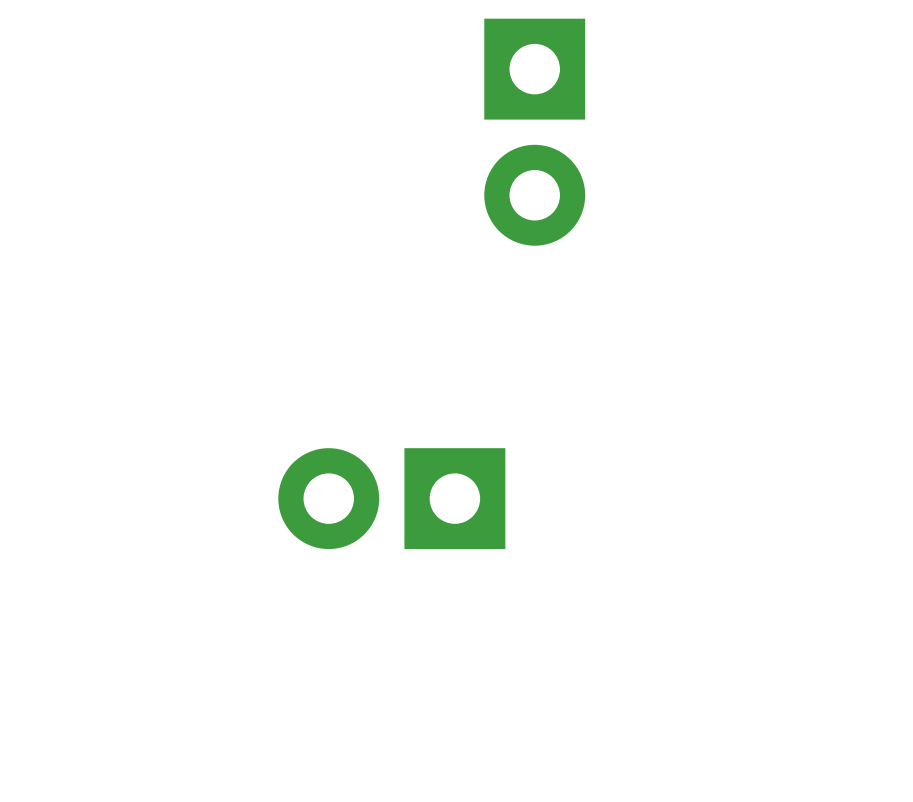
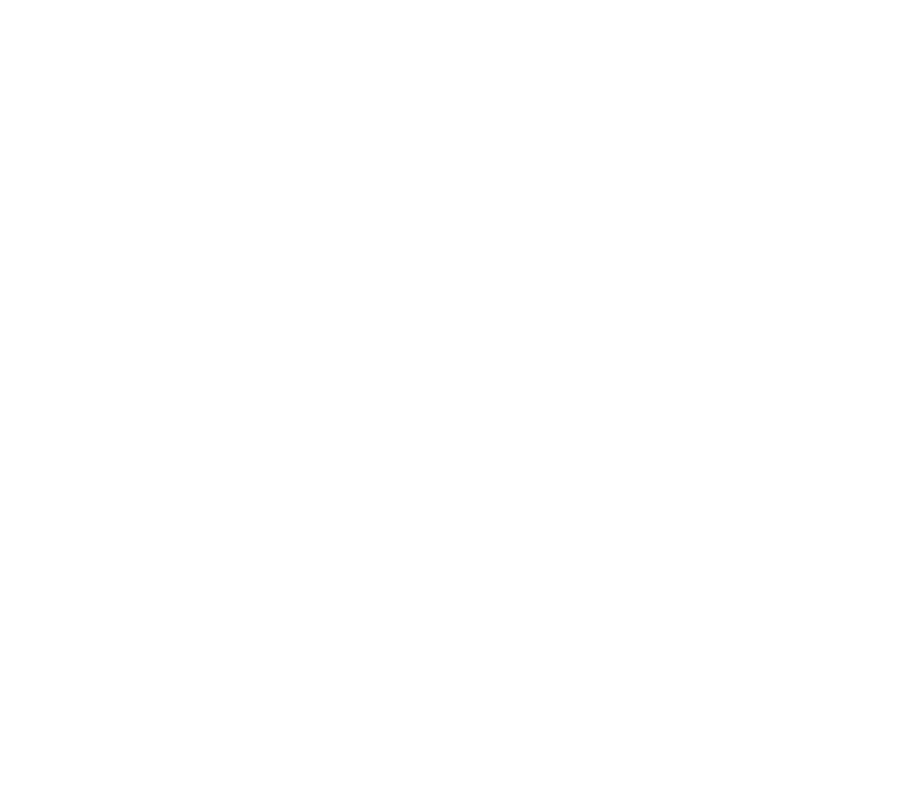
part: (534, 132) -> none
part: (391, 498) -> none

